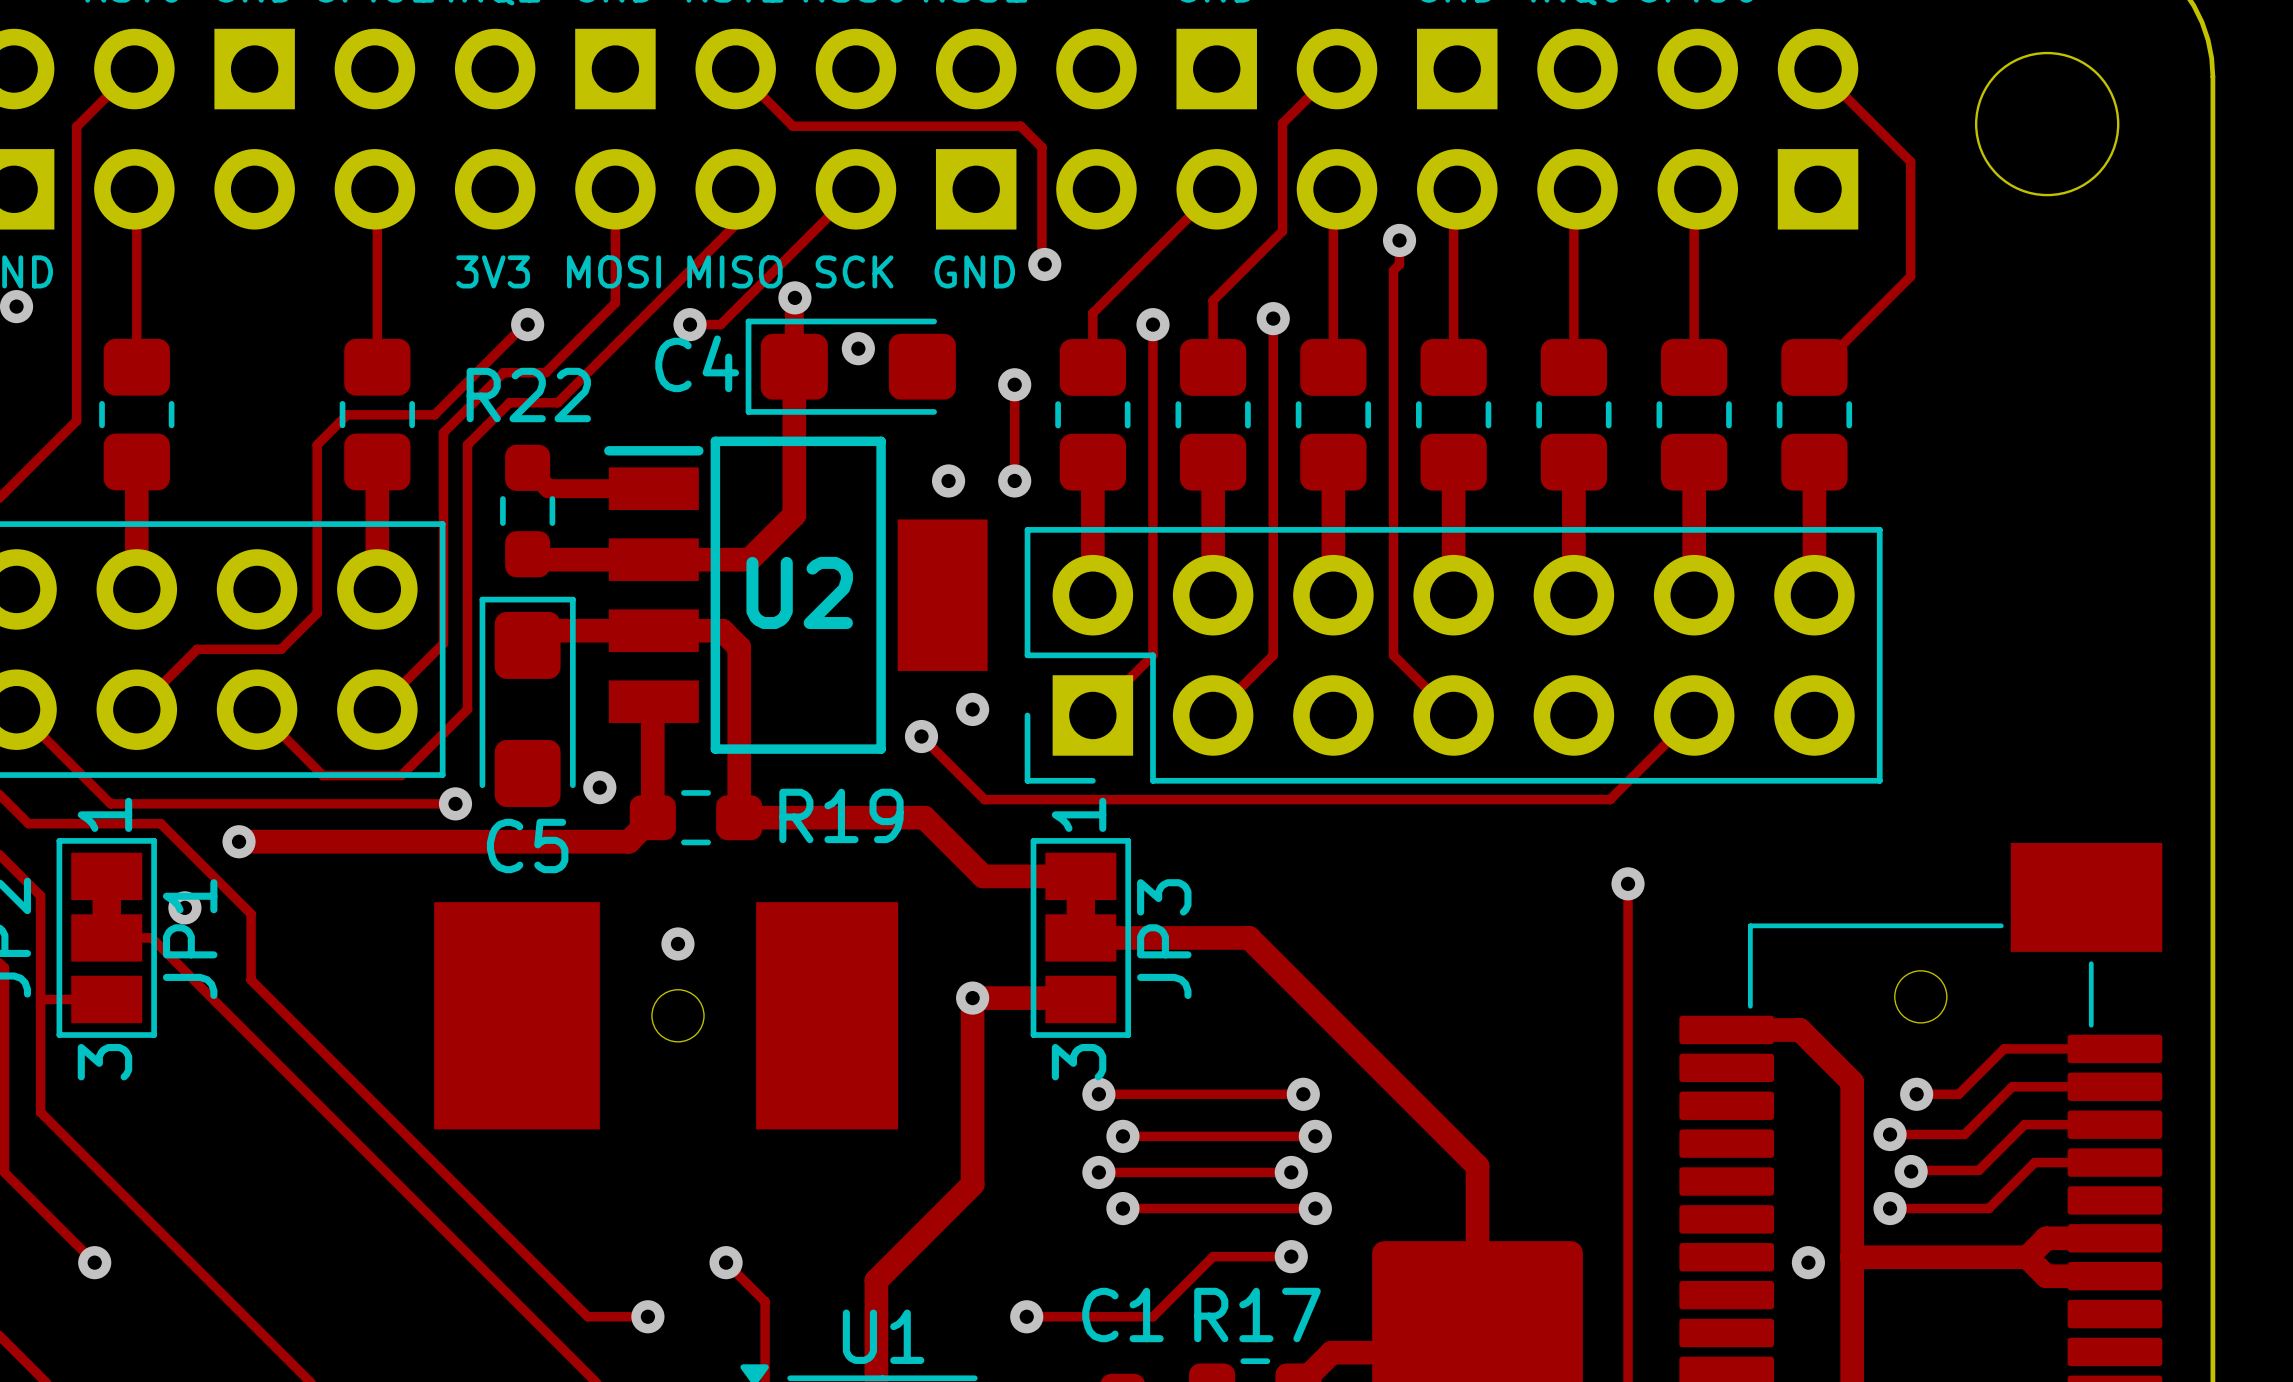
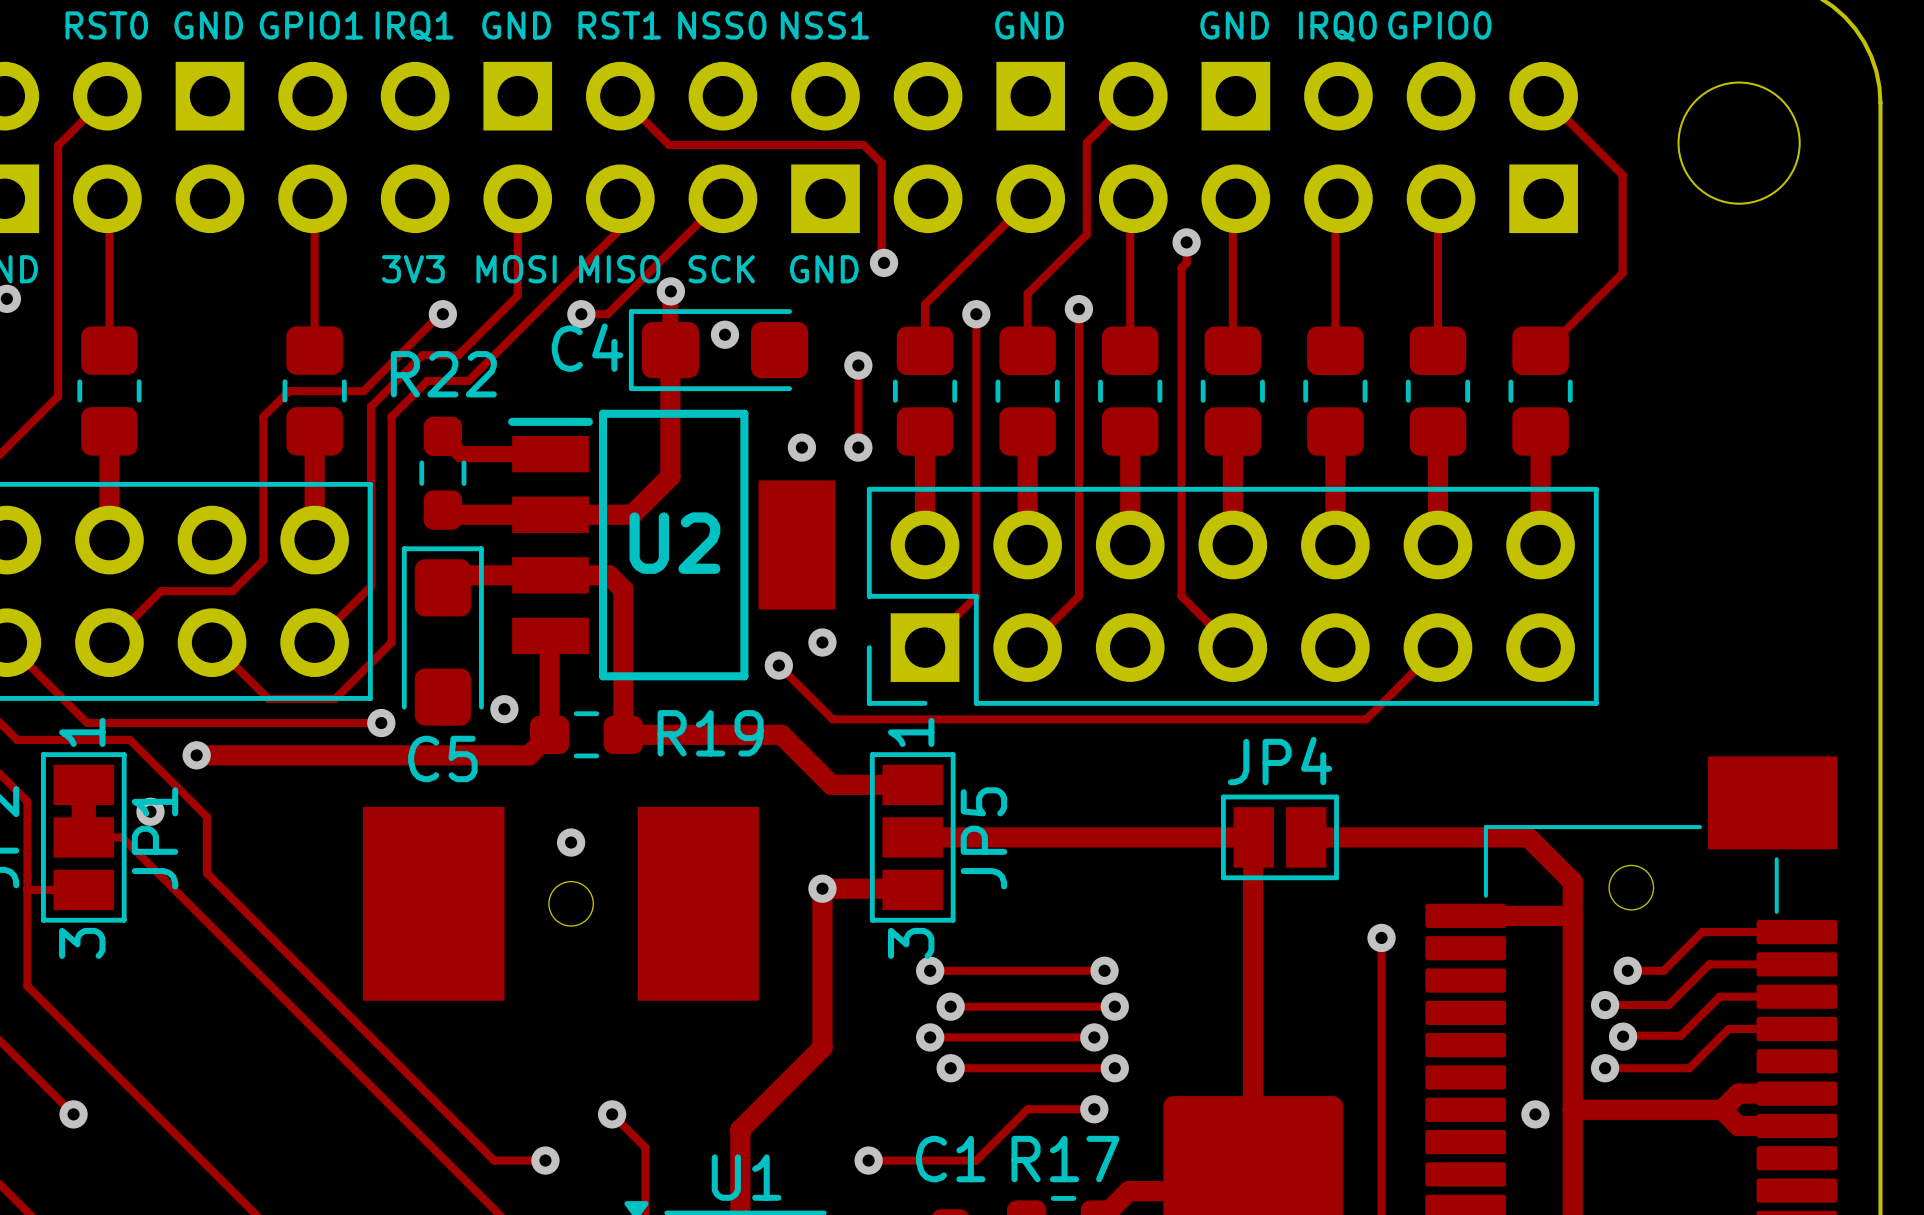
track: (1628, 883) (1628, 1055) -> none
via position: (1628, 883) -> (1381, 937)
JP5: none -> (912, 837)
JP3: (1080, 937) -> none
track: (1249, 937) (1477, 1166) -> (1058, 837) (1253, 837)
JP4: none -> (1279, 837)
track: none -> (1306, 837) (1528, 837) (1572, 881) (1572, 960)
track: none -> (1253, 837) (1253, 1032)
track: (1800, 1029) (1852, 1082) -> (1528, 915) (1572, 915)

